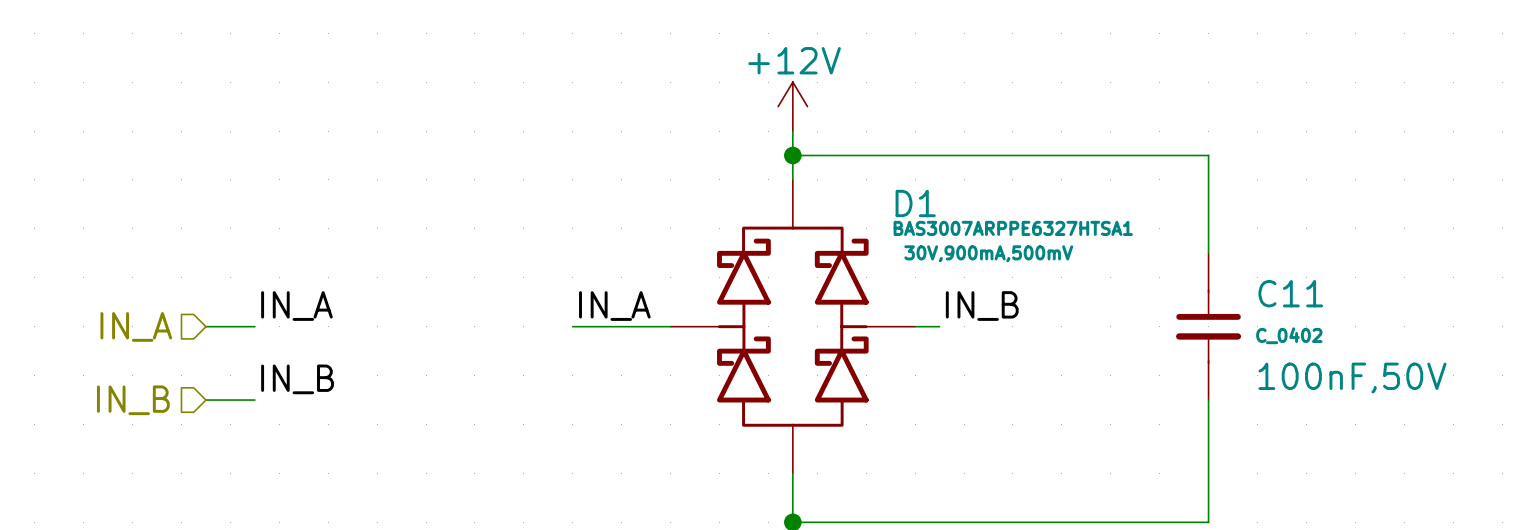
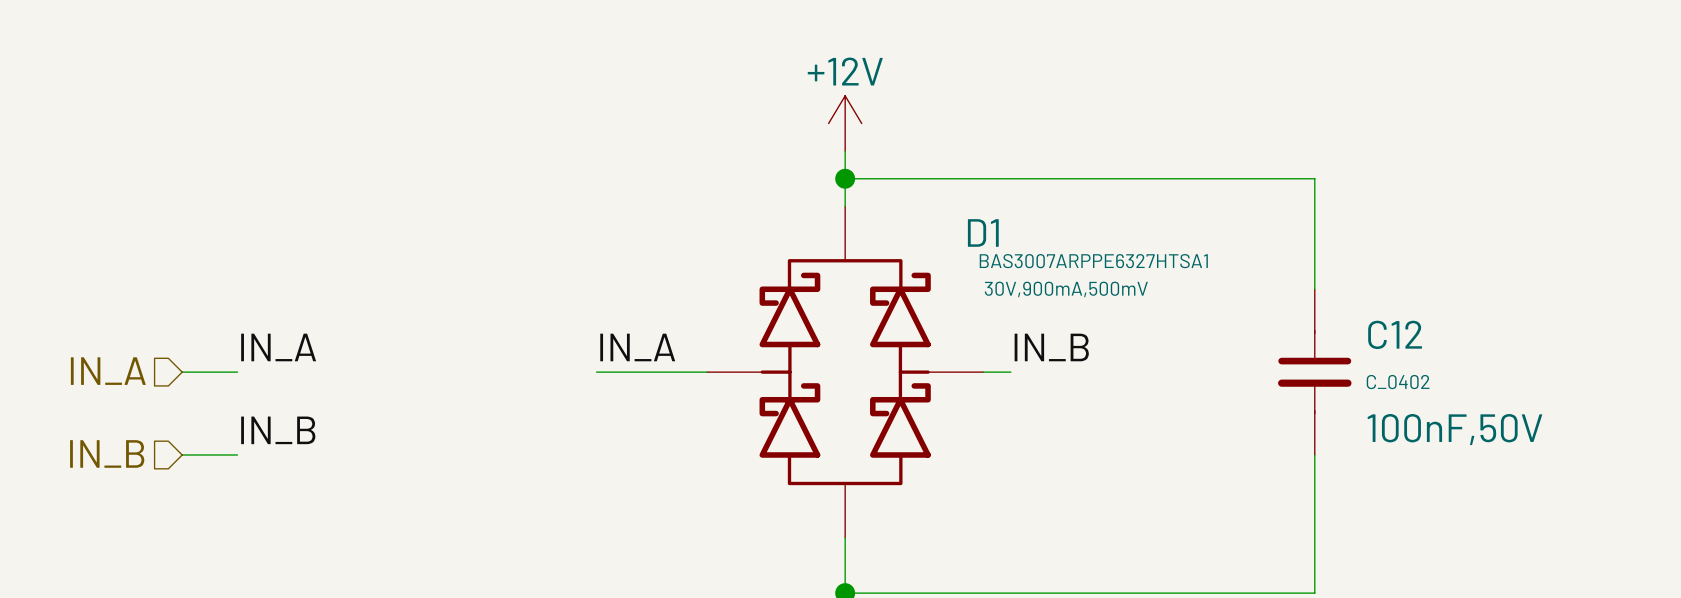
C11 name: C11 (1290, 293) -> C12 (1395, 334)

